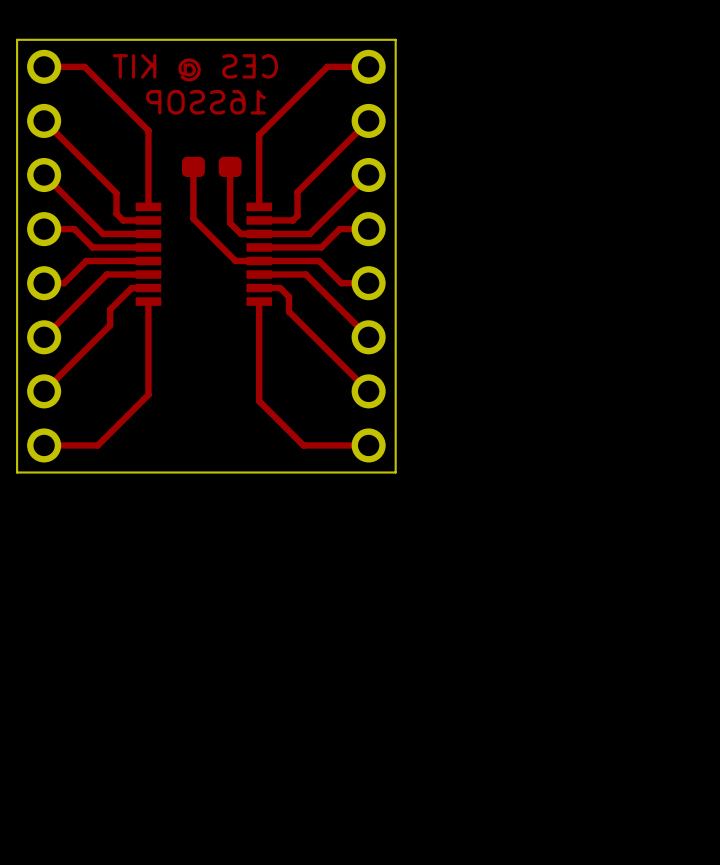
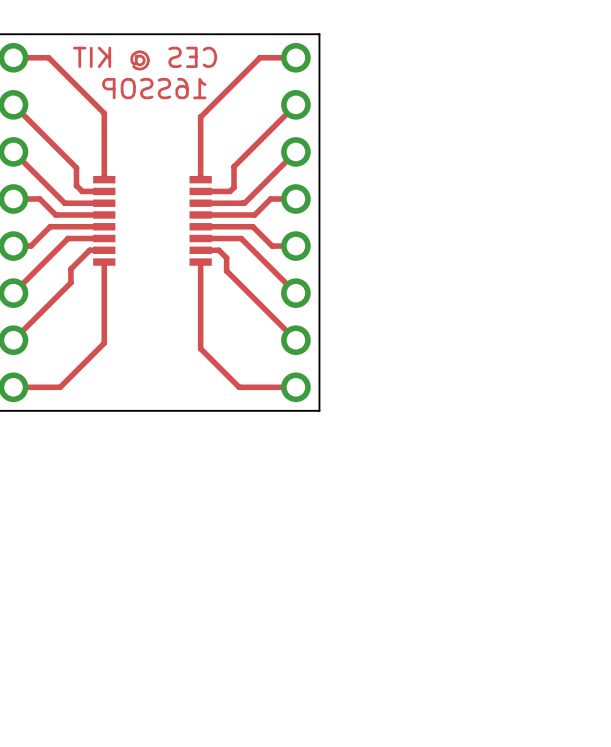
top track: (193, 166) (193, 218) (235, 261) (259, 261) -> none
part: (211, 166) -> none
top track: (230, 166) (230, 223) (240, 233) (259, 233) -> none

